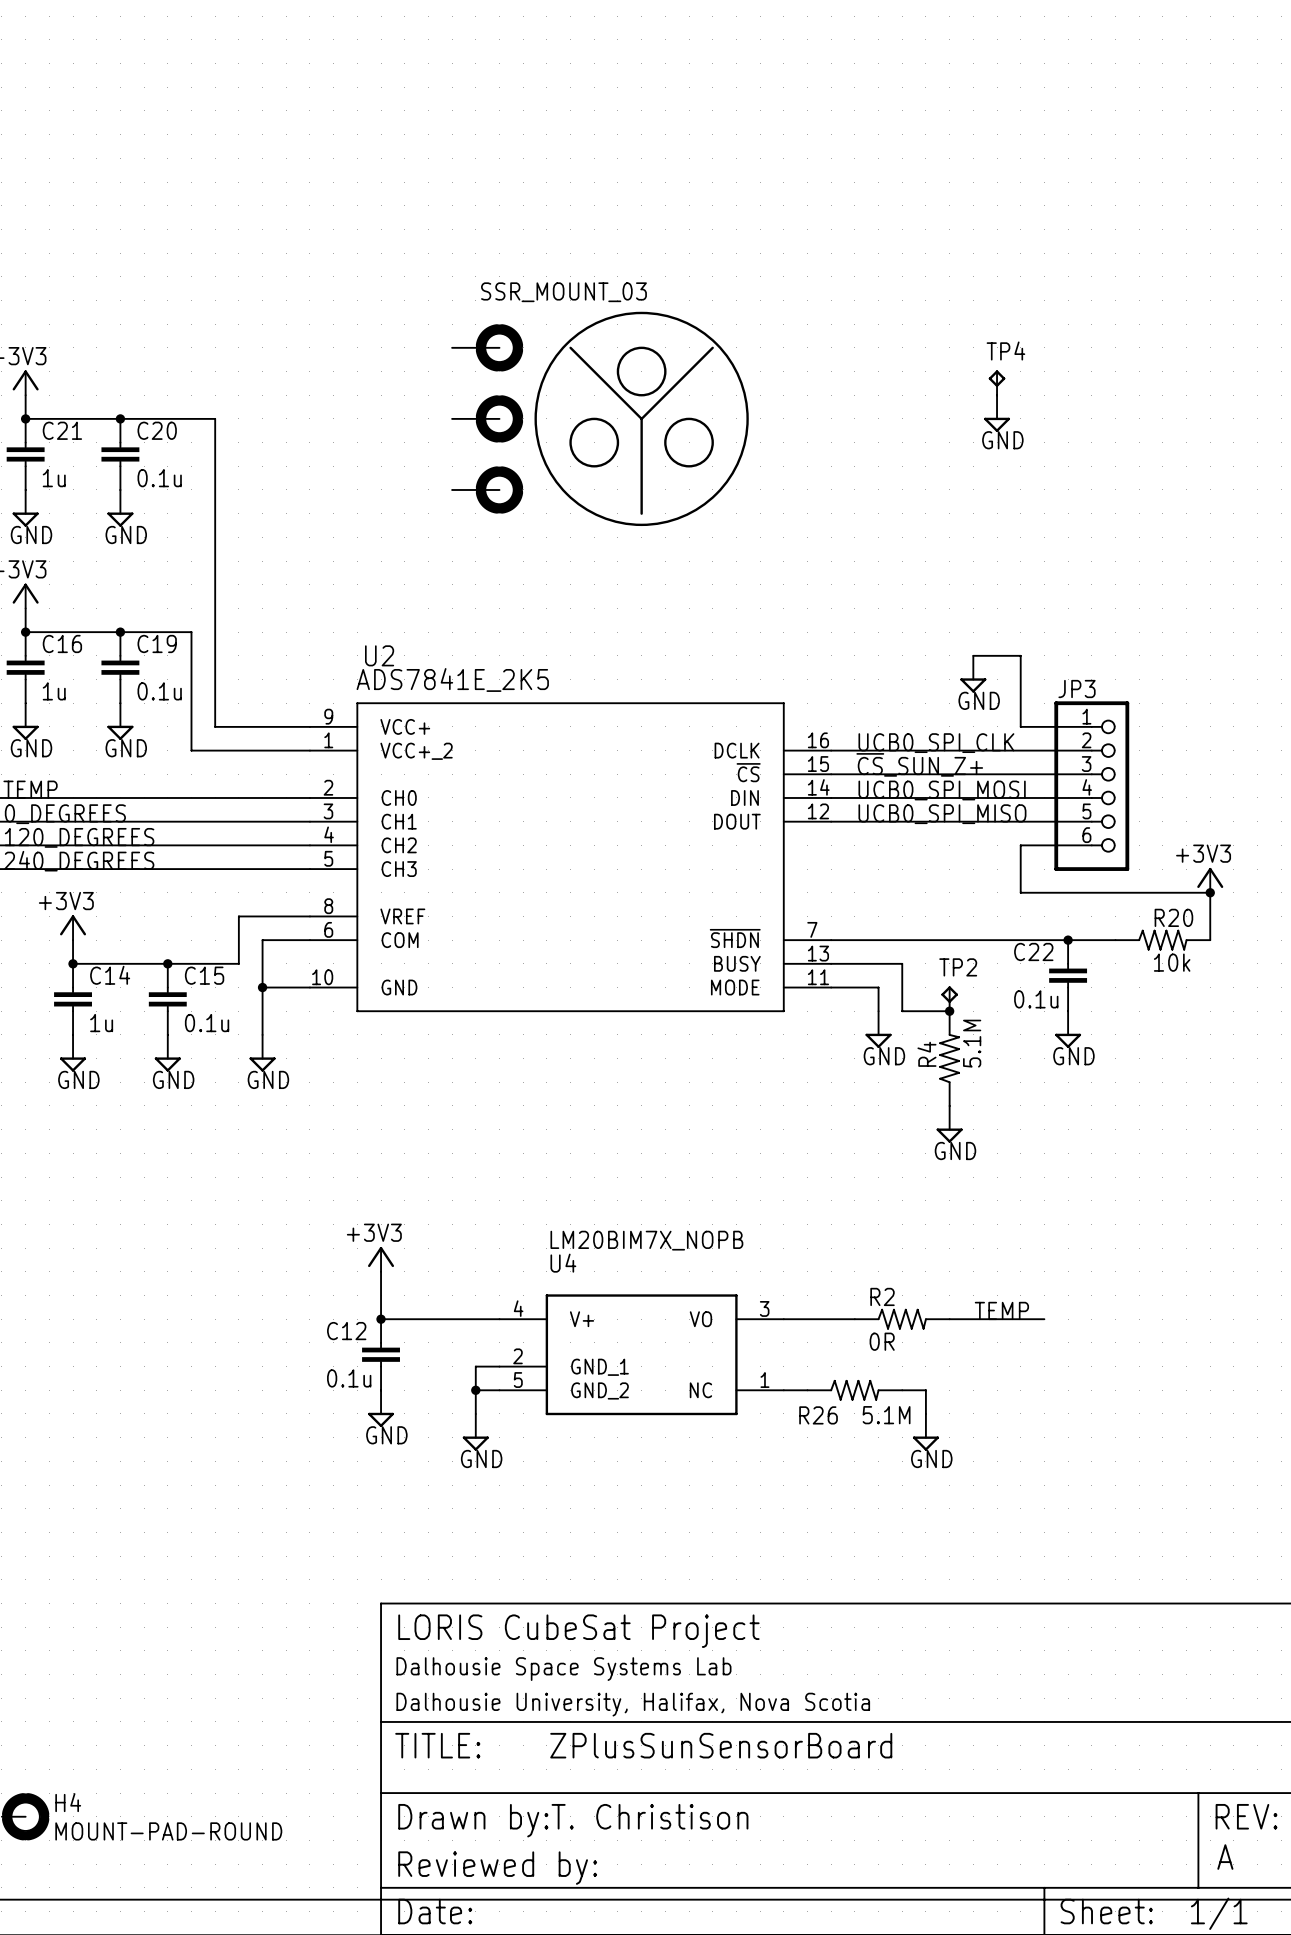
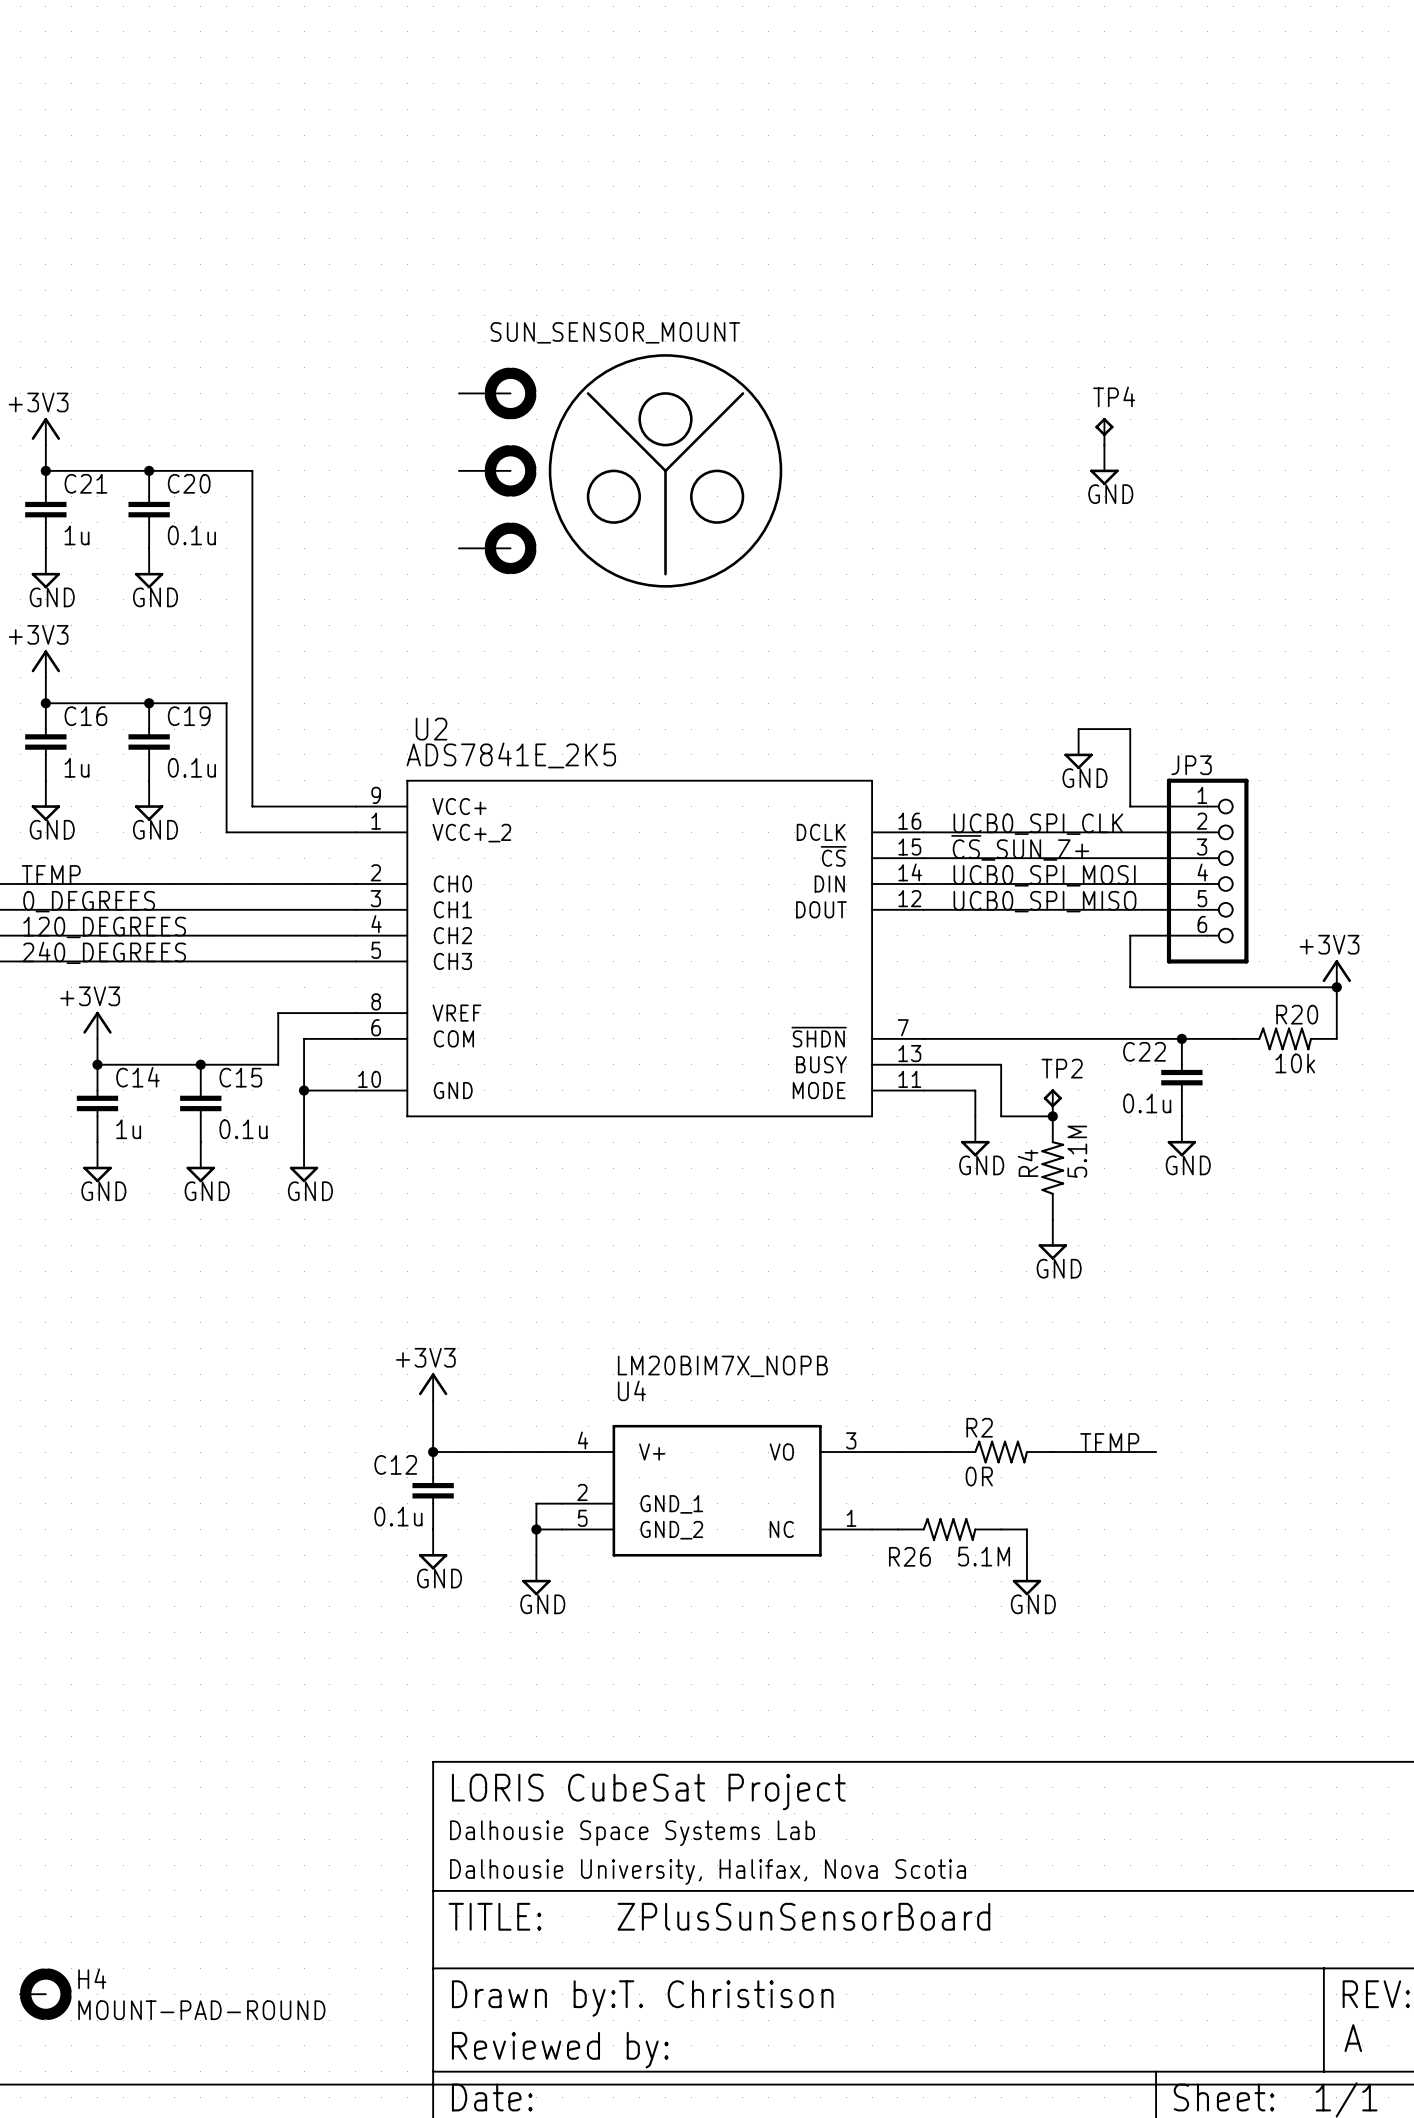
part: none -> SUN_SENSOR_MOUNT (620, 470)
part: SSR_MOUNT_03 (600, 418) -> none

